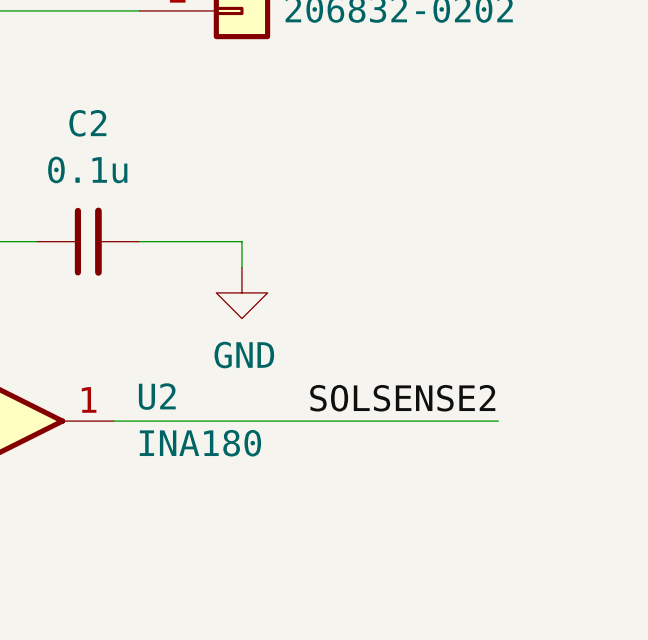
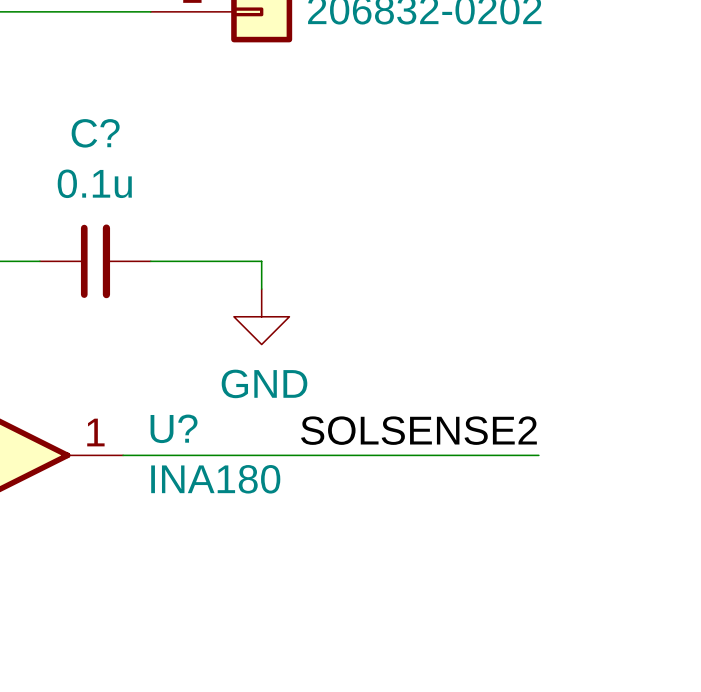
C2 name: C2 (87, 123) -> C? (95, 133)
U2 name: U2 (157, 396) -> U? (174, 428)

